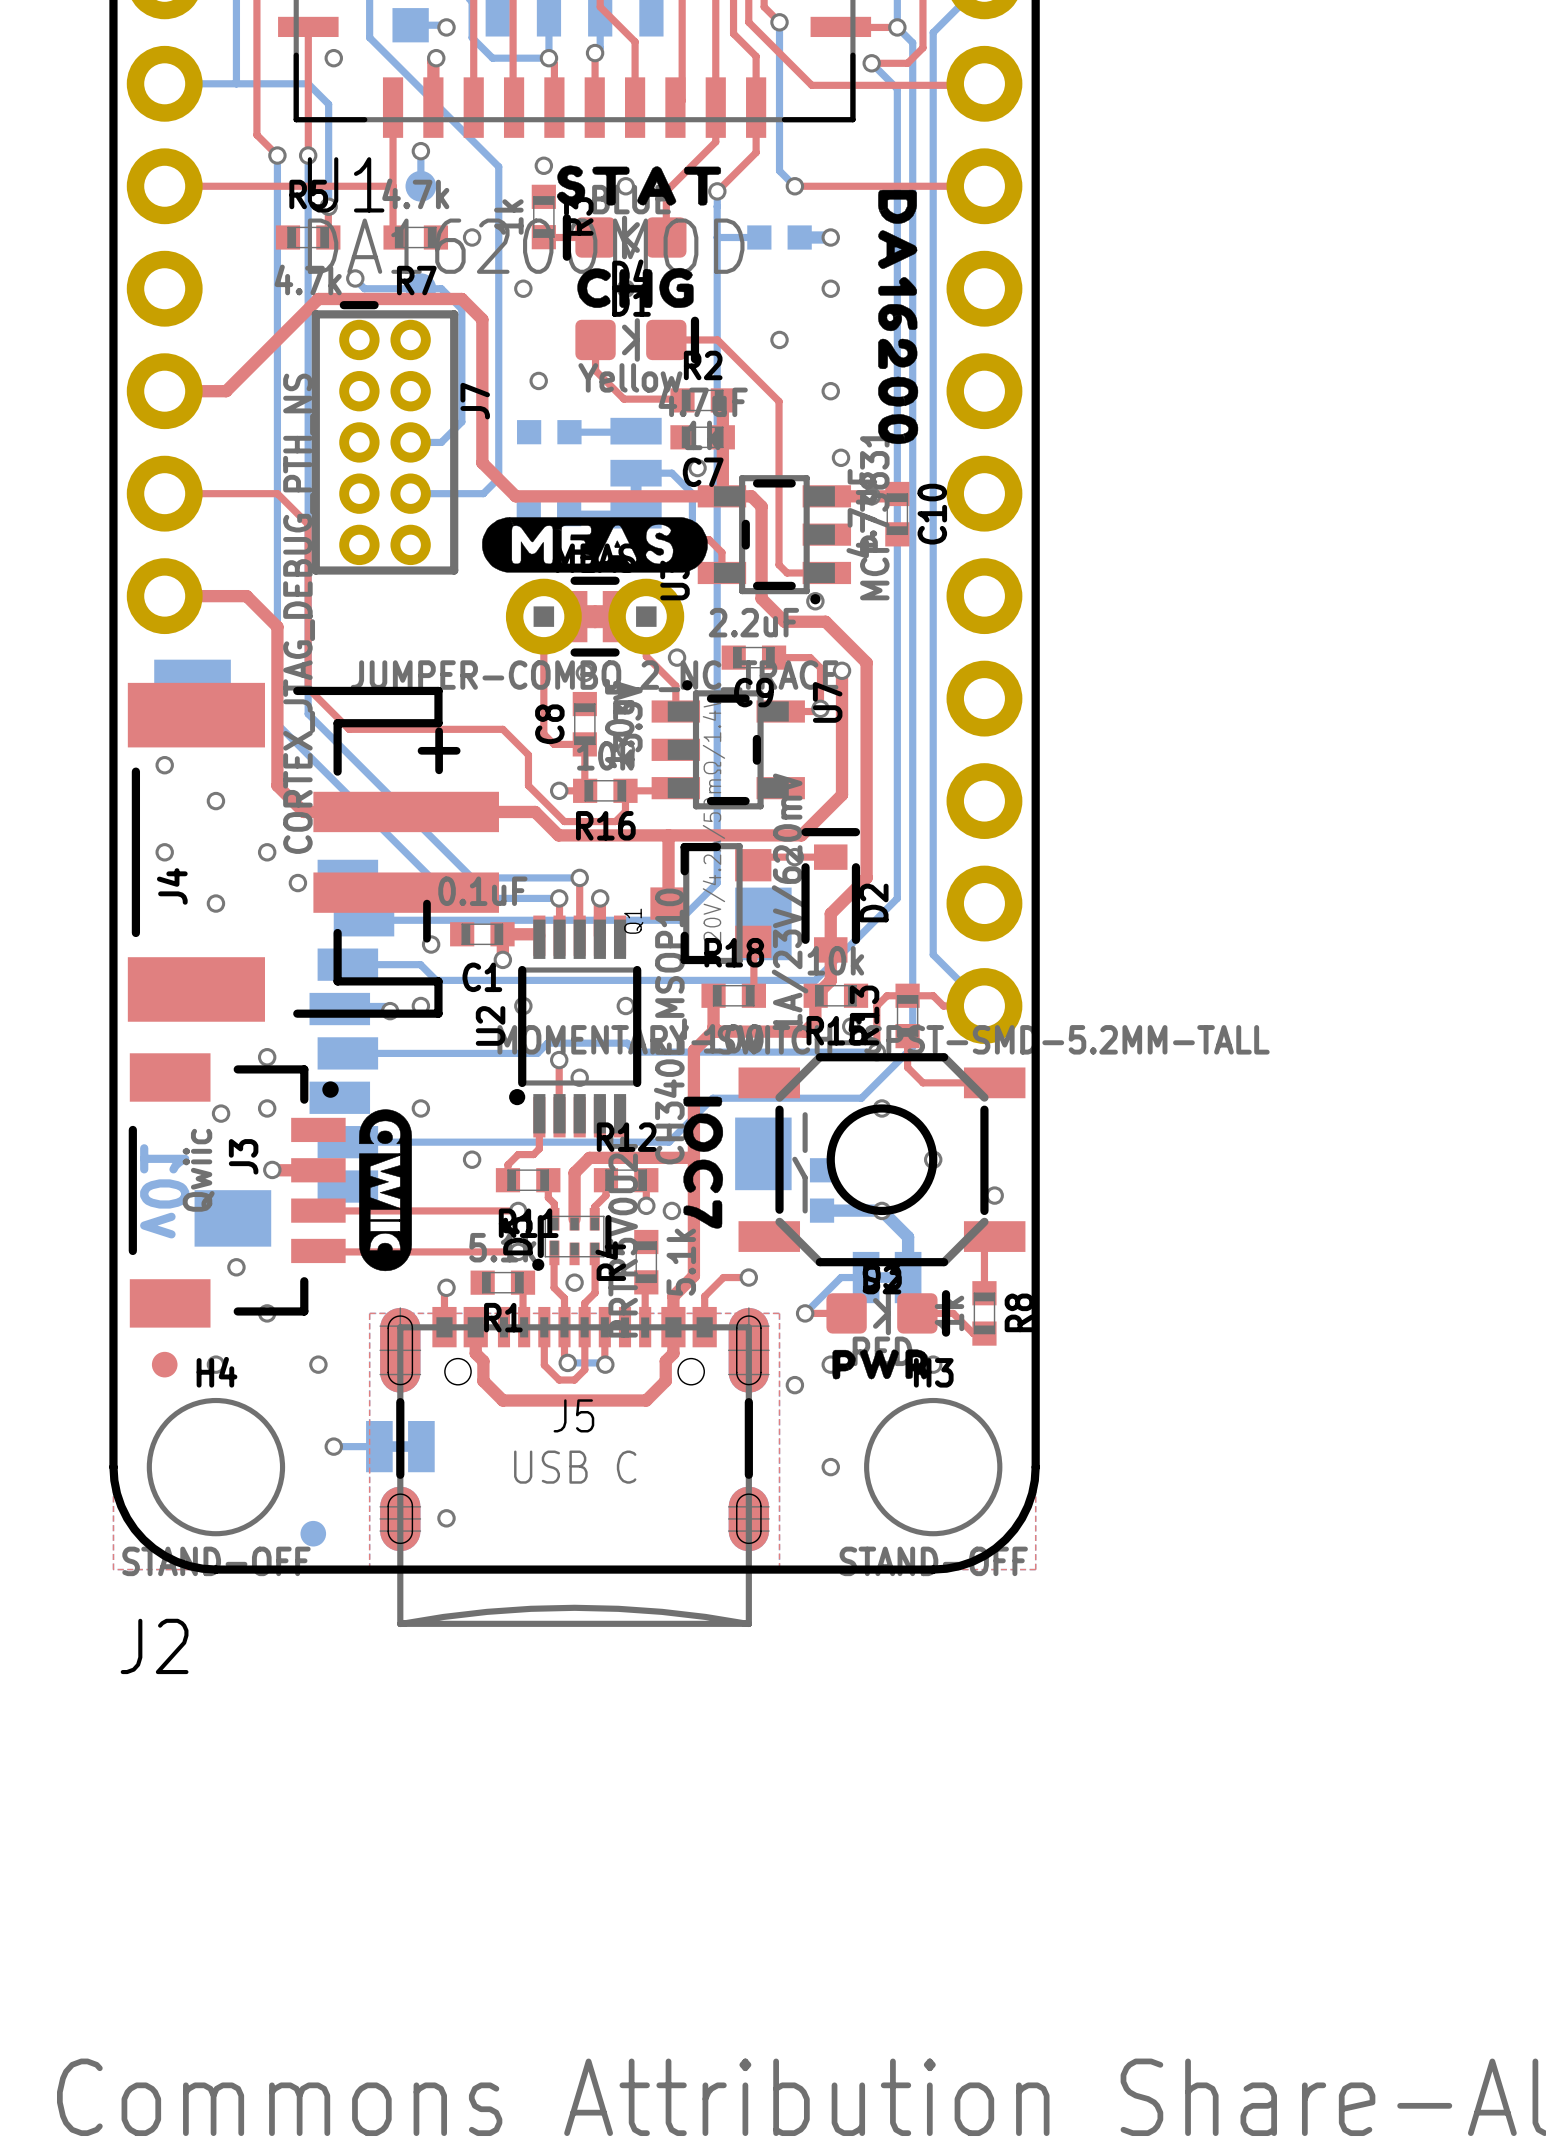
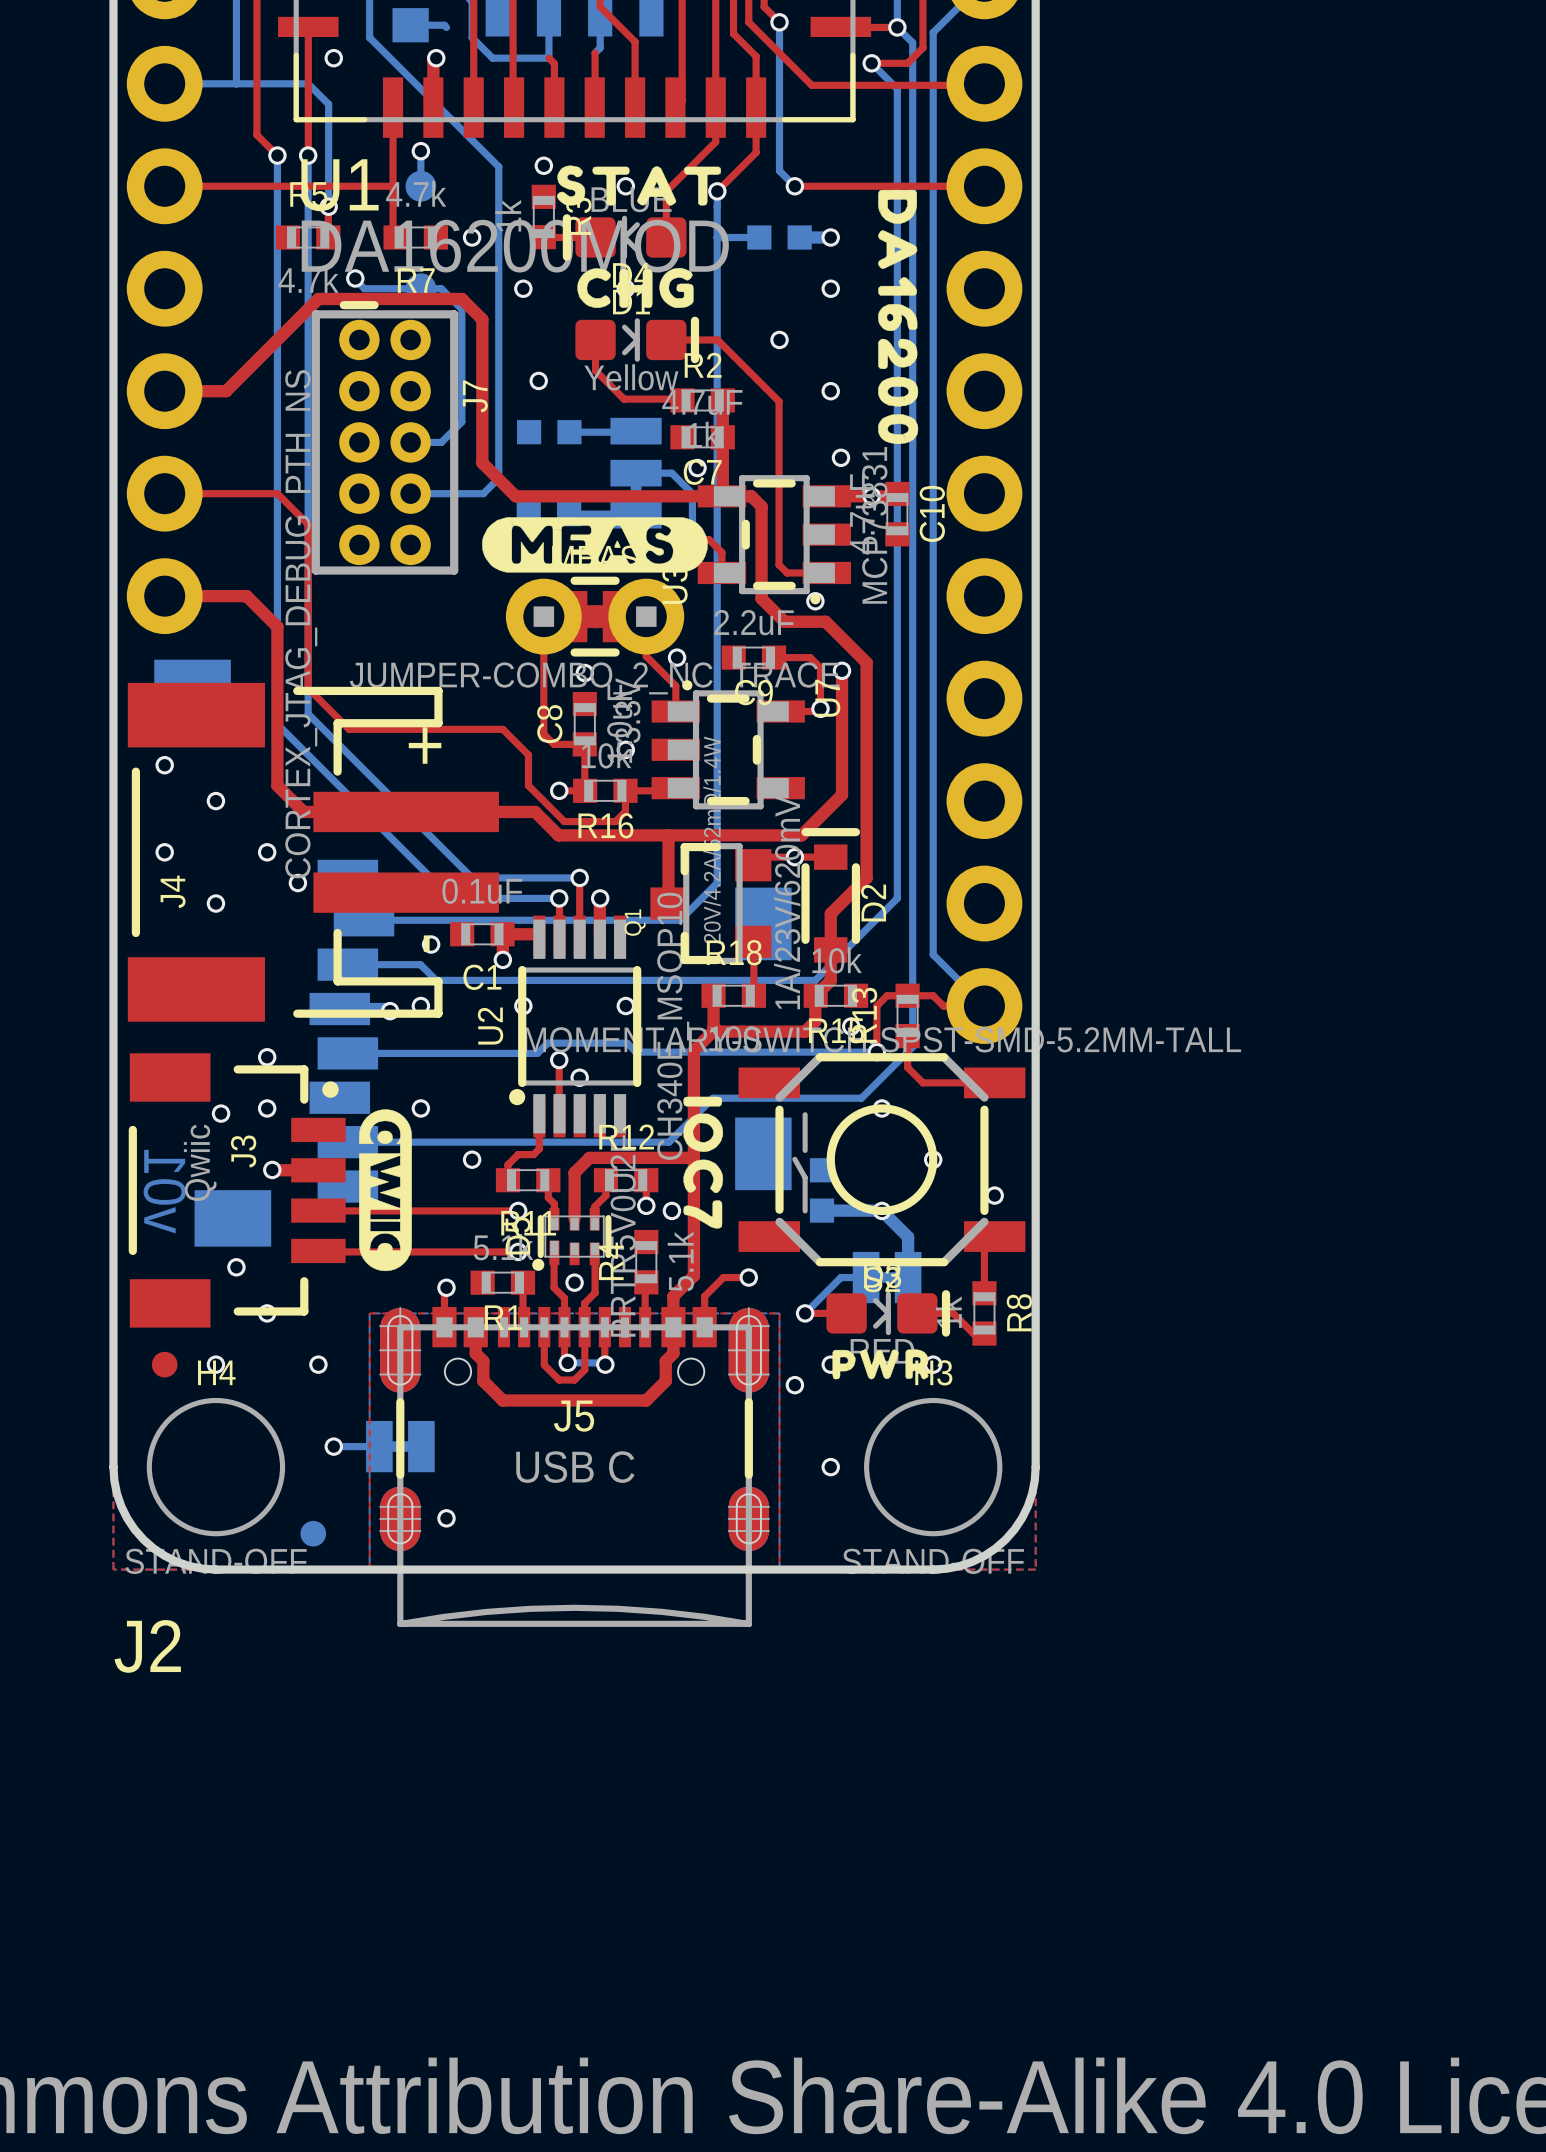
via: (446, 27) -> none
via: (595, 53) -> none
via: (548, 58) -> none

